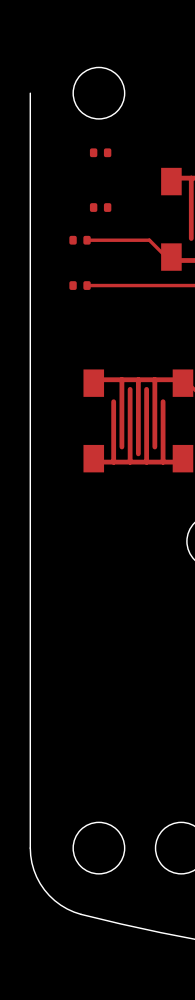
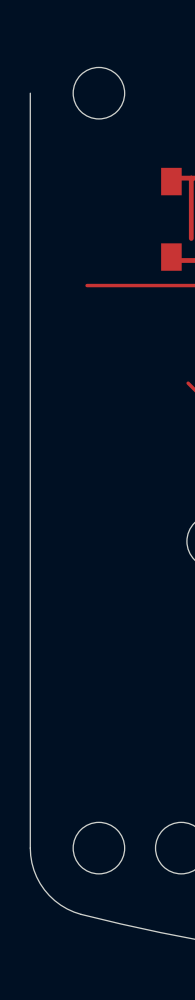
part: (100, 152) -> none
part: (100, 207) -> none
part: (80, 240) -> none
top track: (87, 240) (149, 240) (166, 257) -> none
part: (80, 285) -> none
part: (138, 420) -> none

